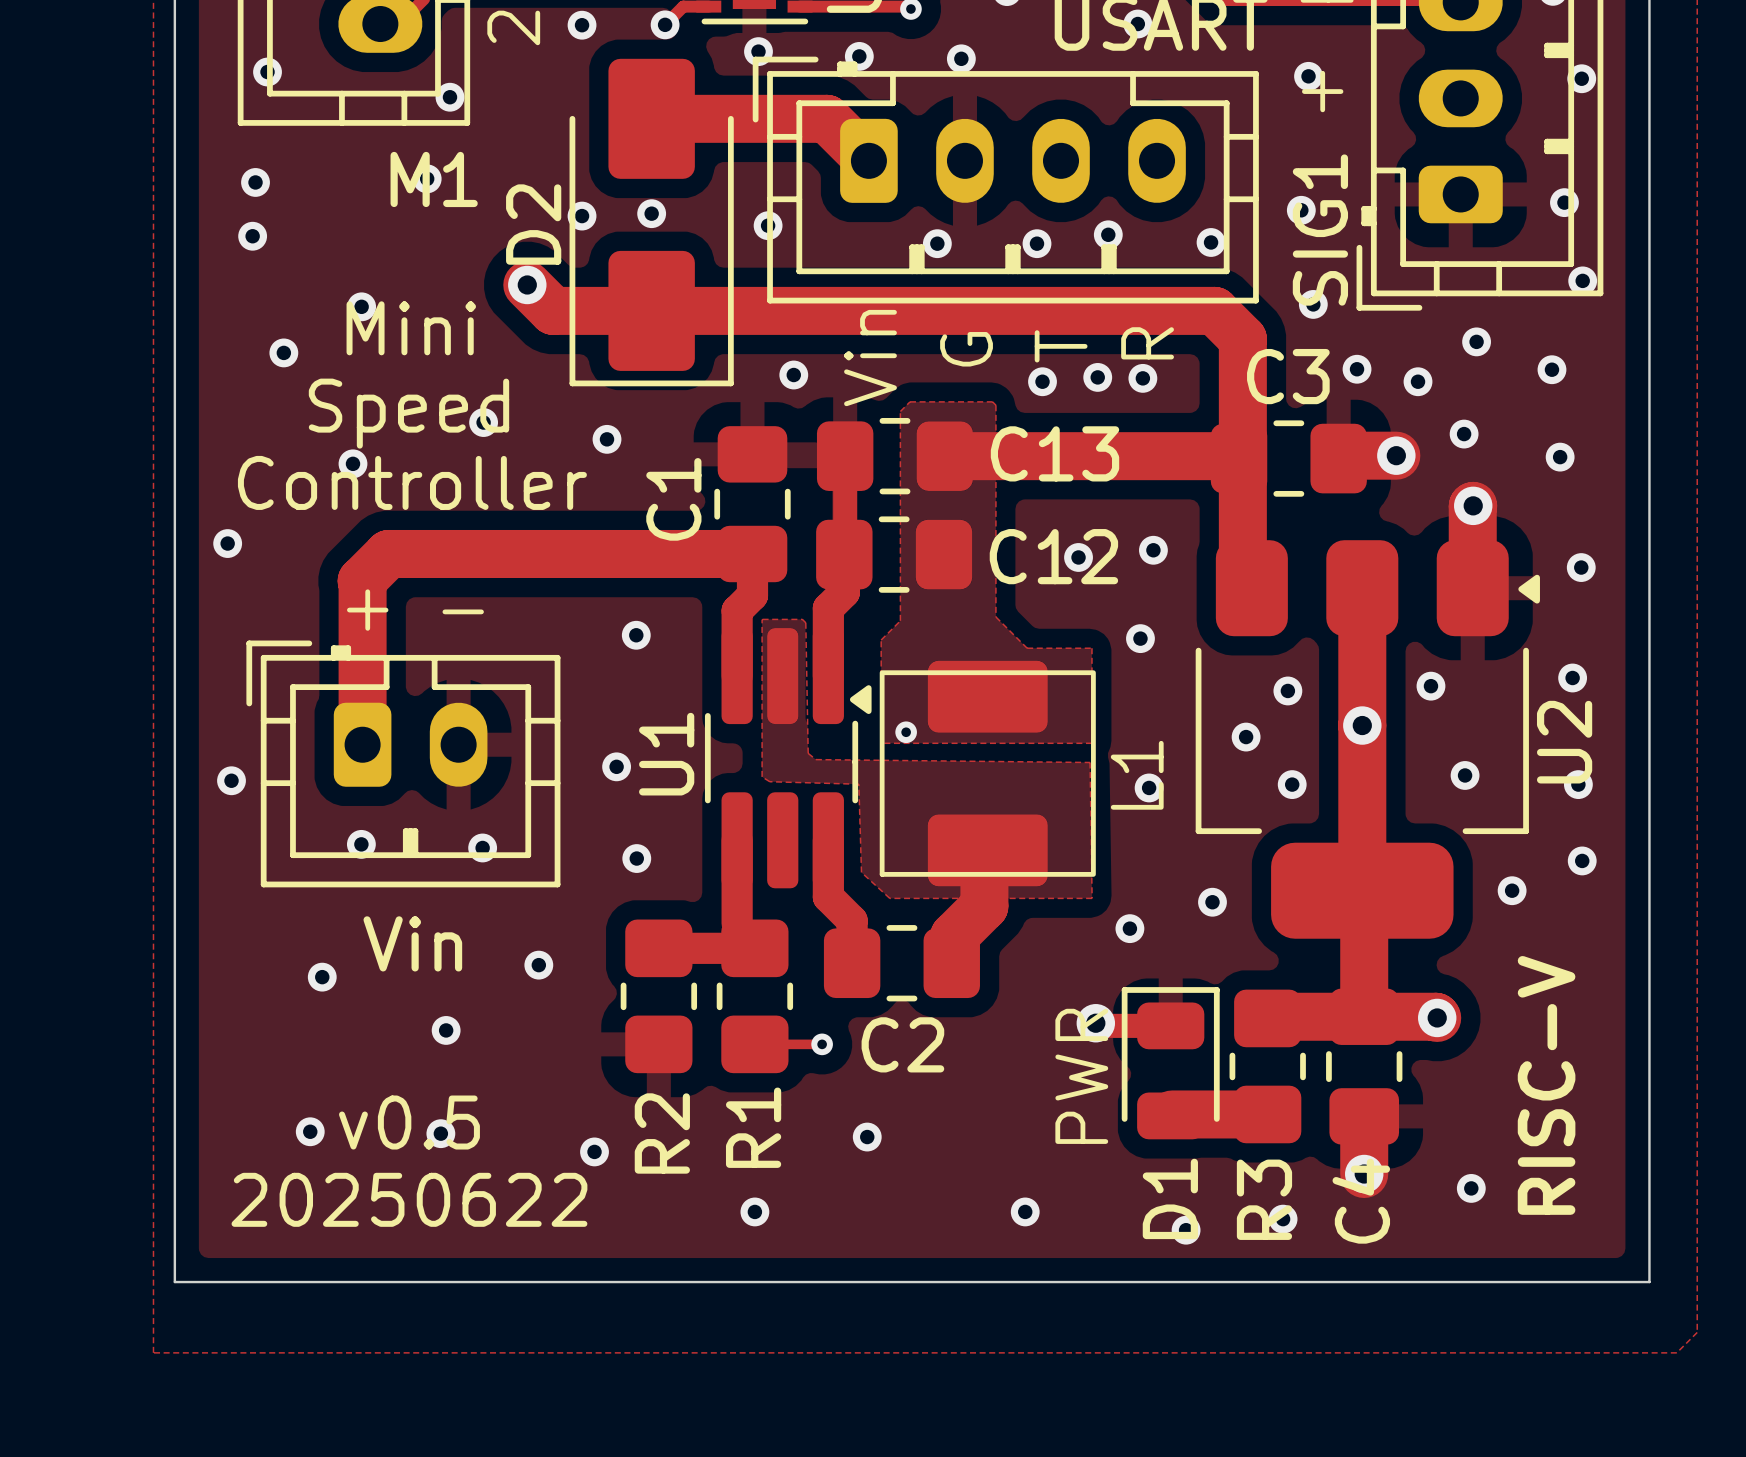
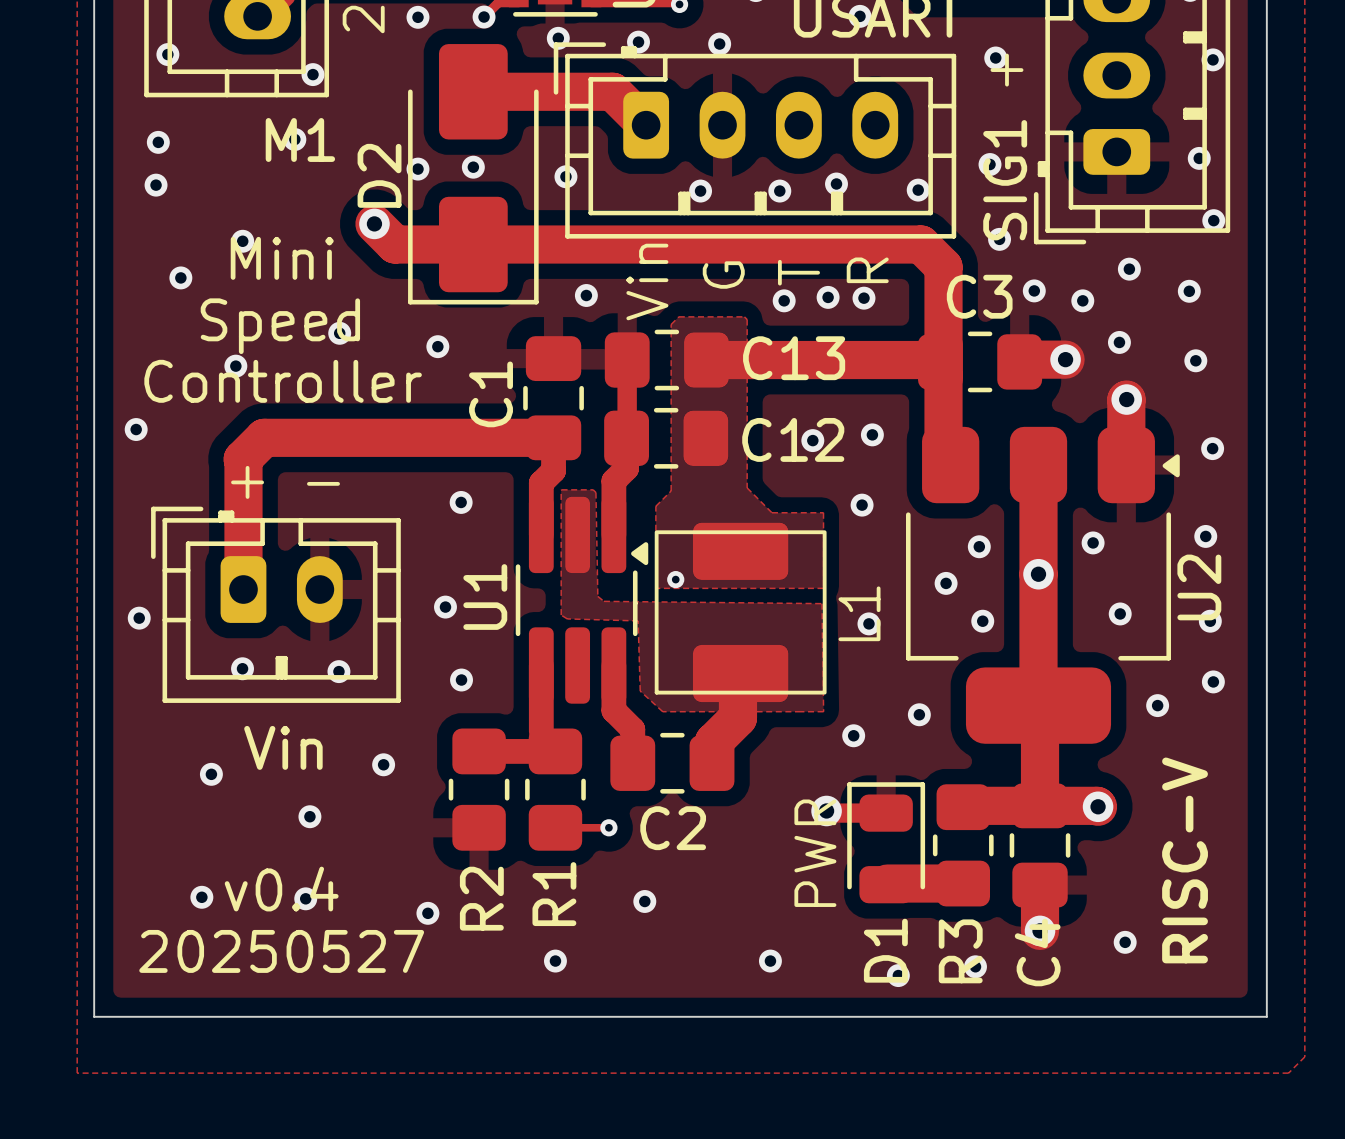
text: v0.5 (409, 1122) -> v0.4 (281, 889)
text: 20250622 (409, 1199) -> 20250527 (281, 951)

